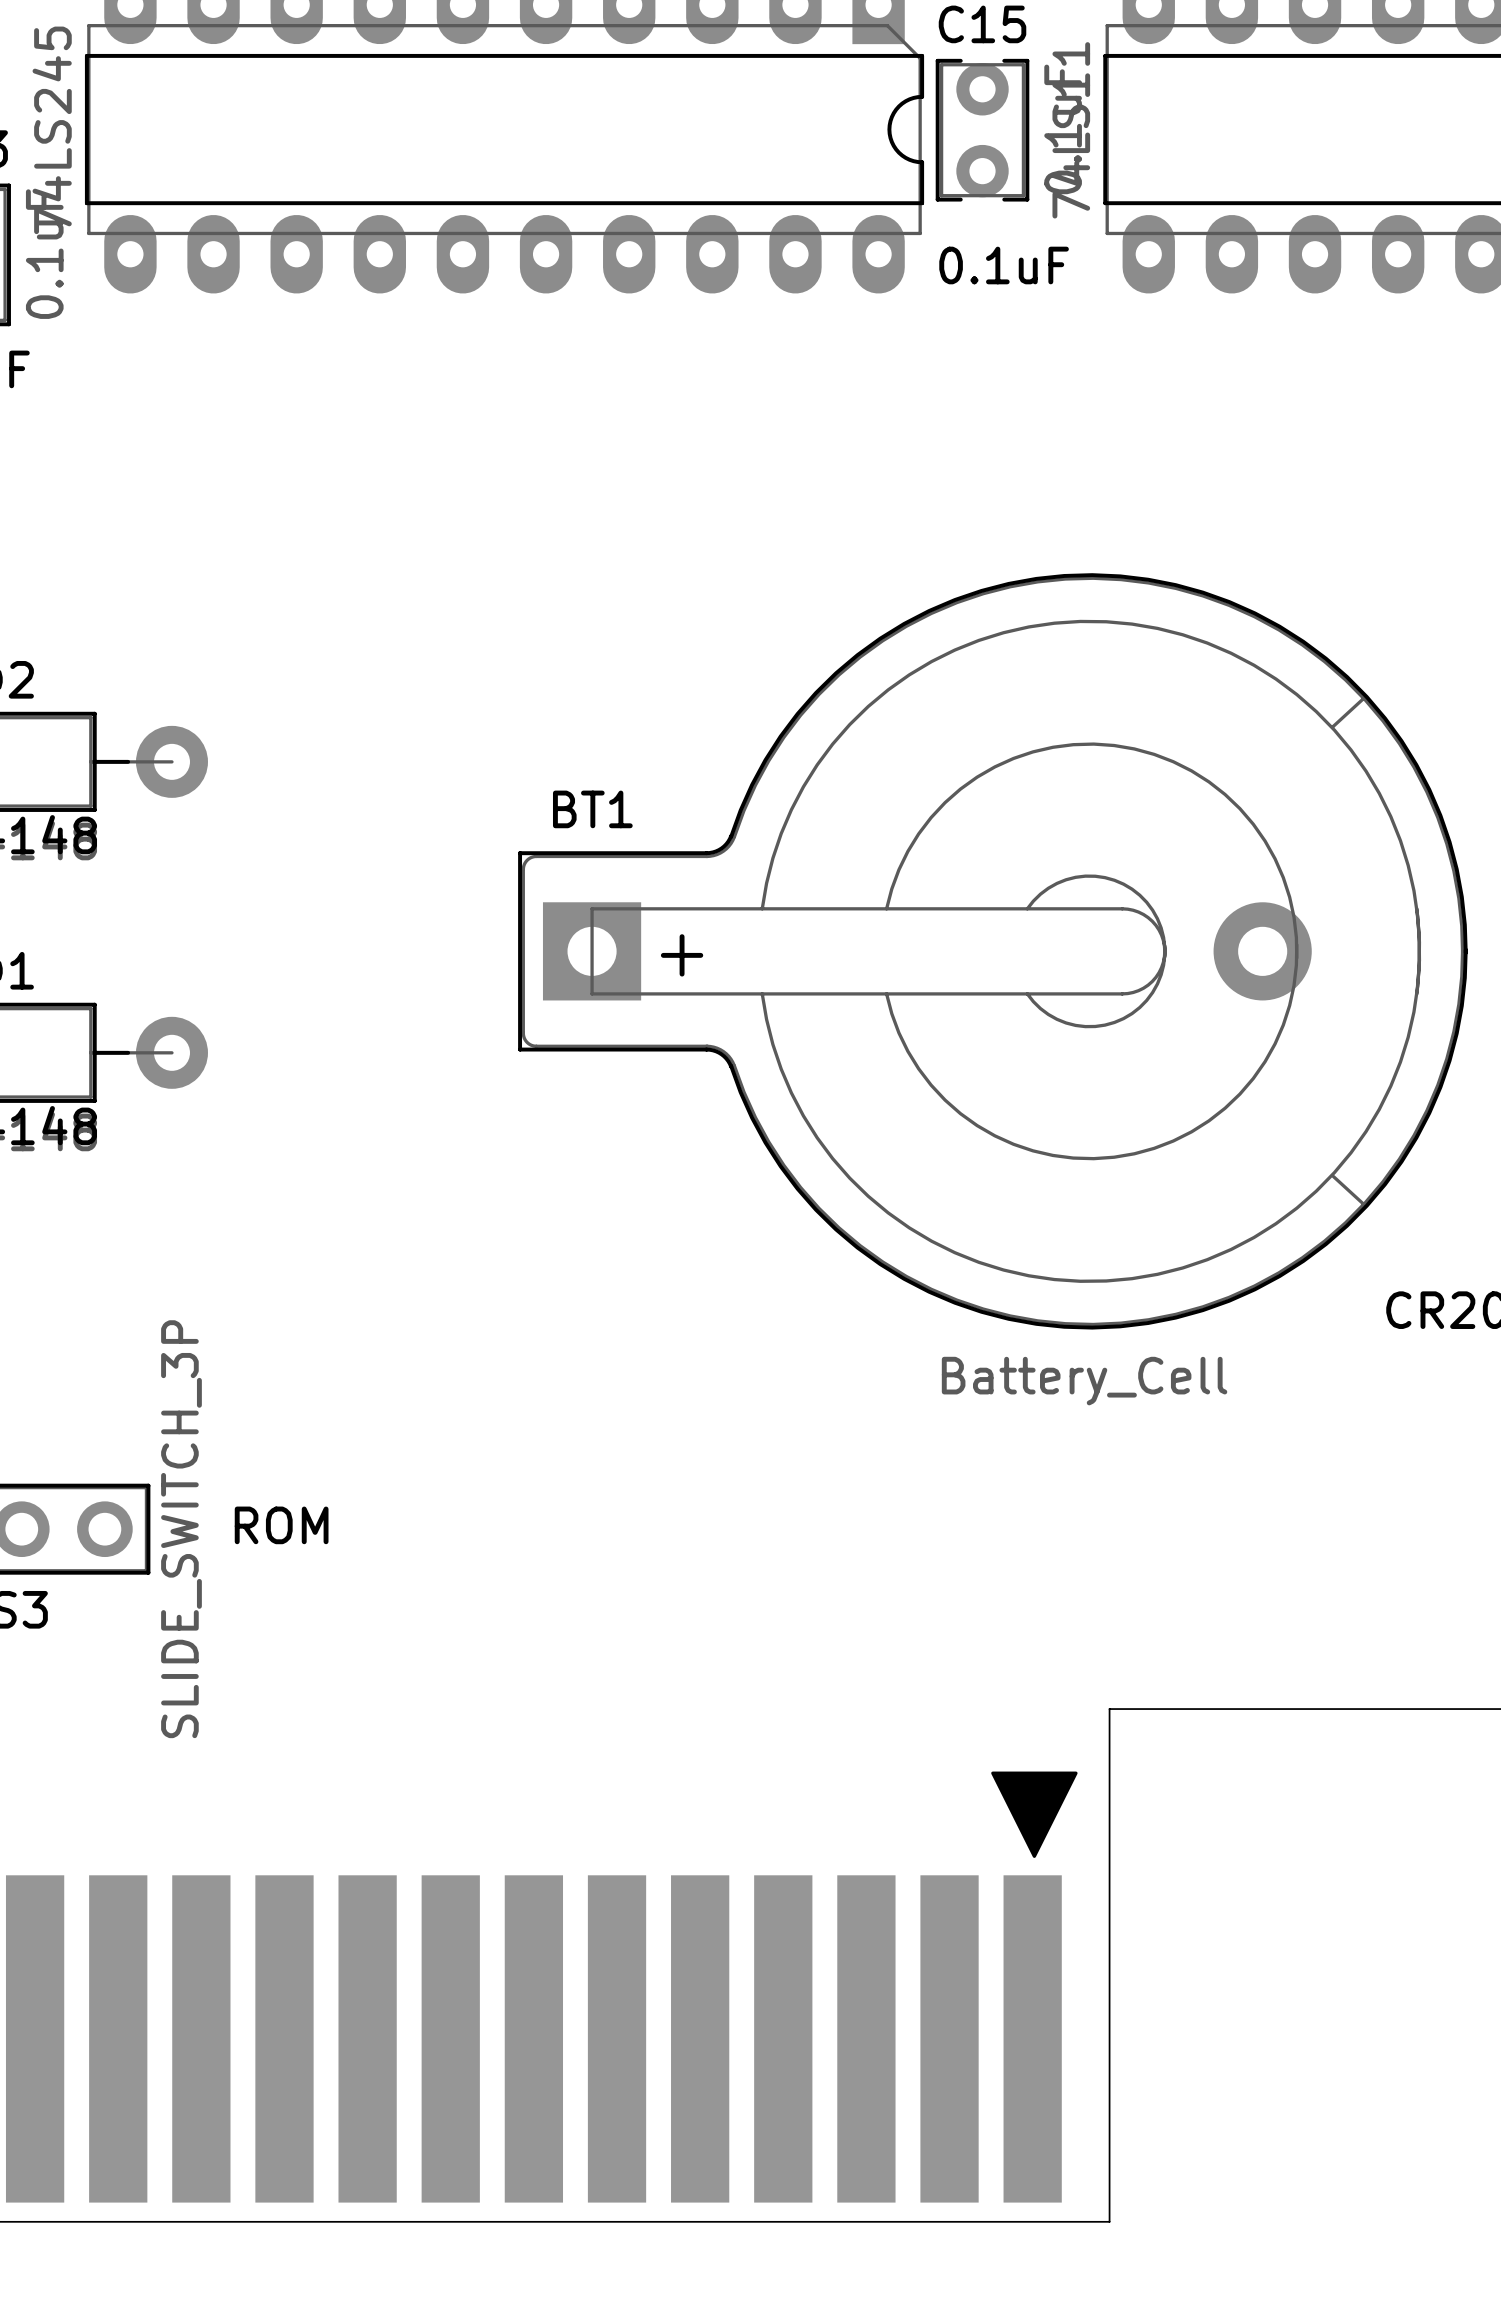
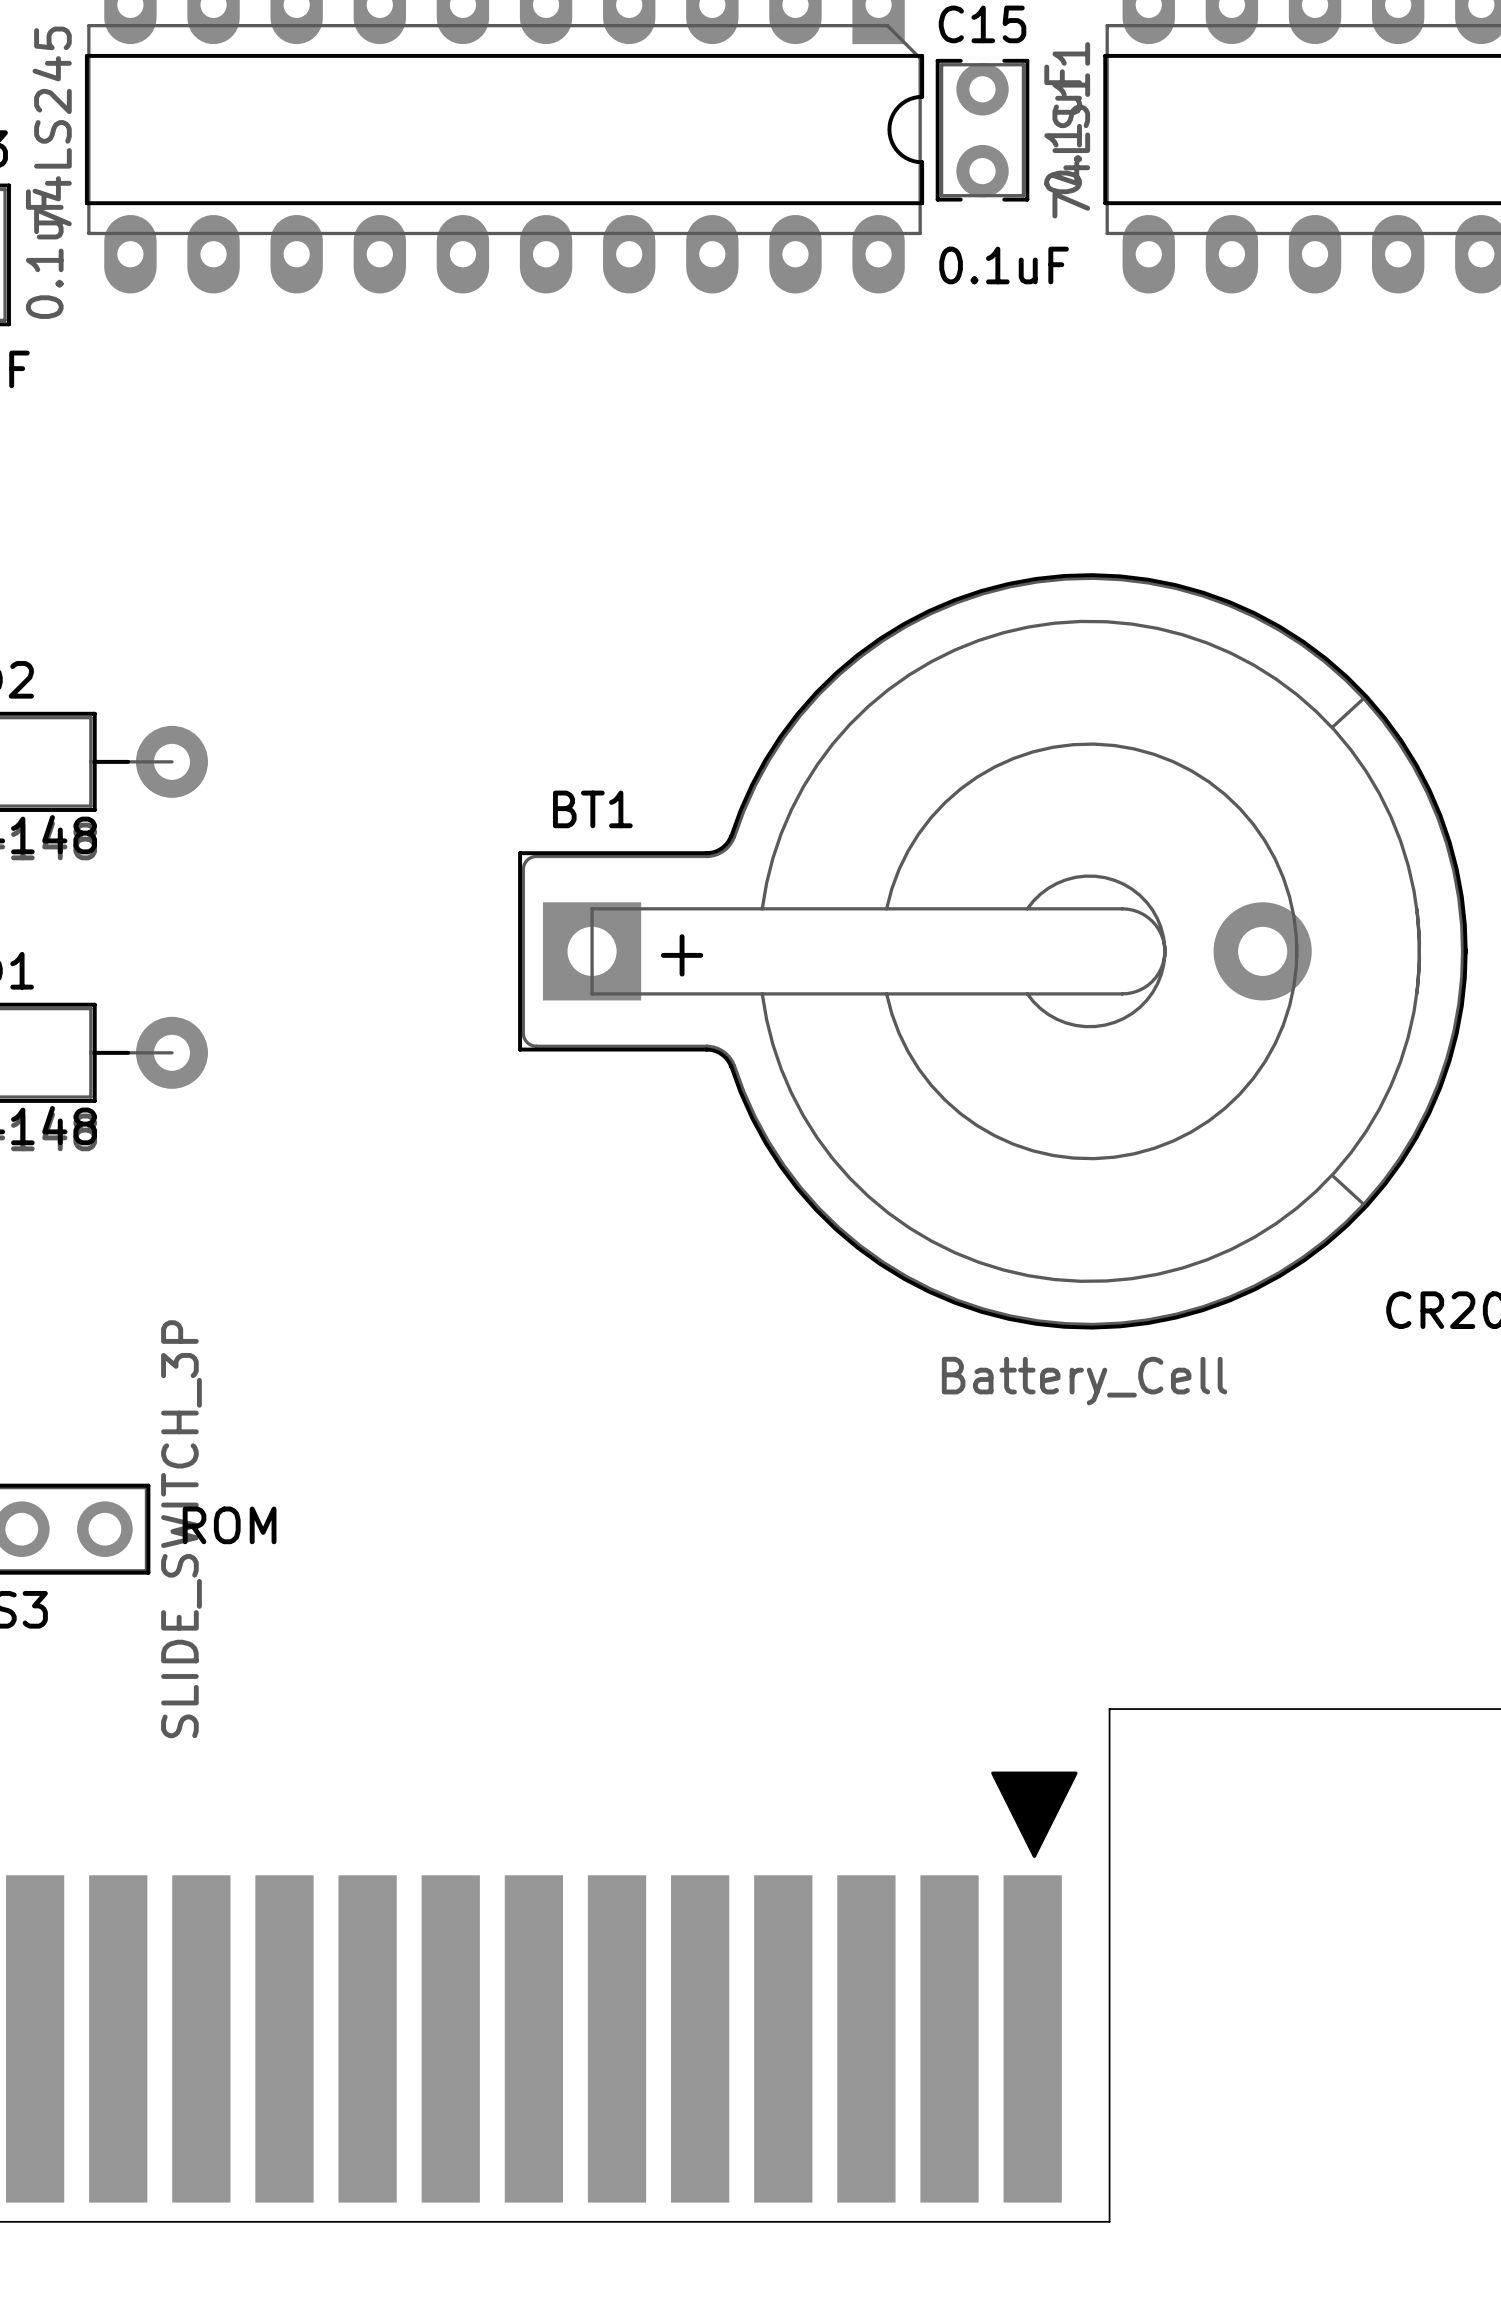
text position: ROM (281, 1525) -> ROM (229, 1525)

